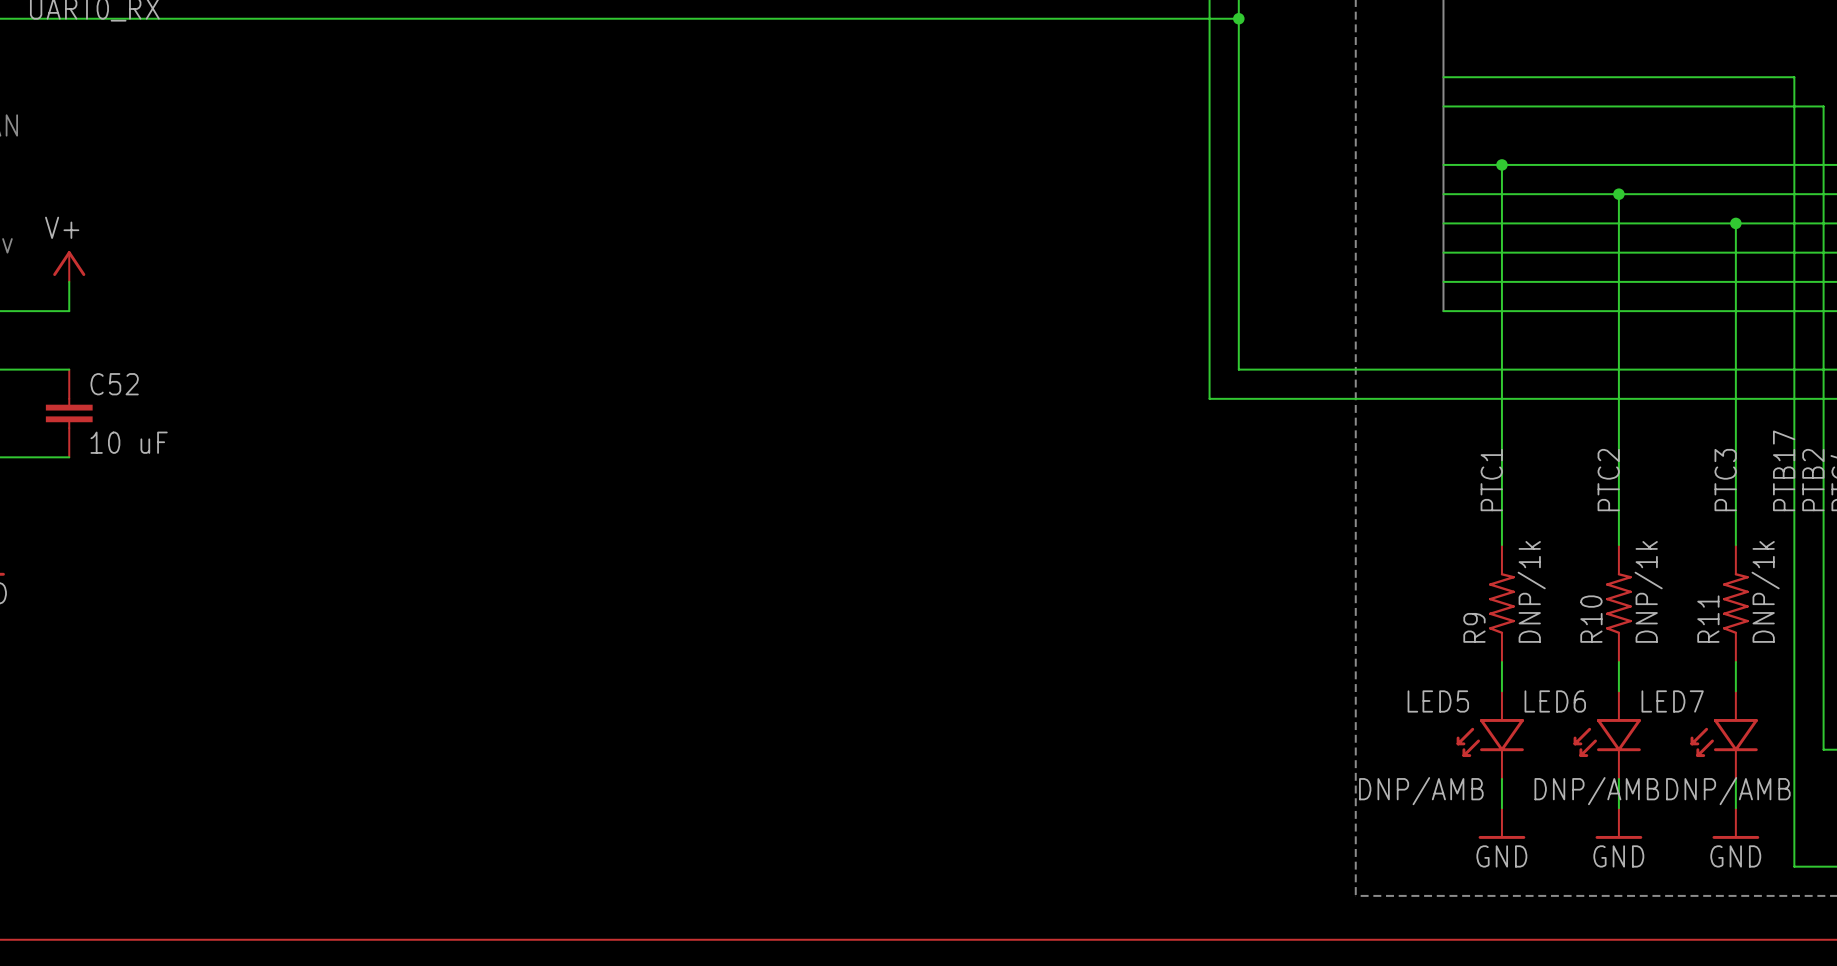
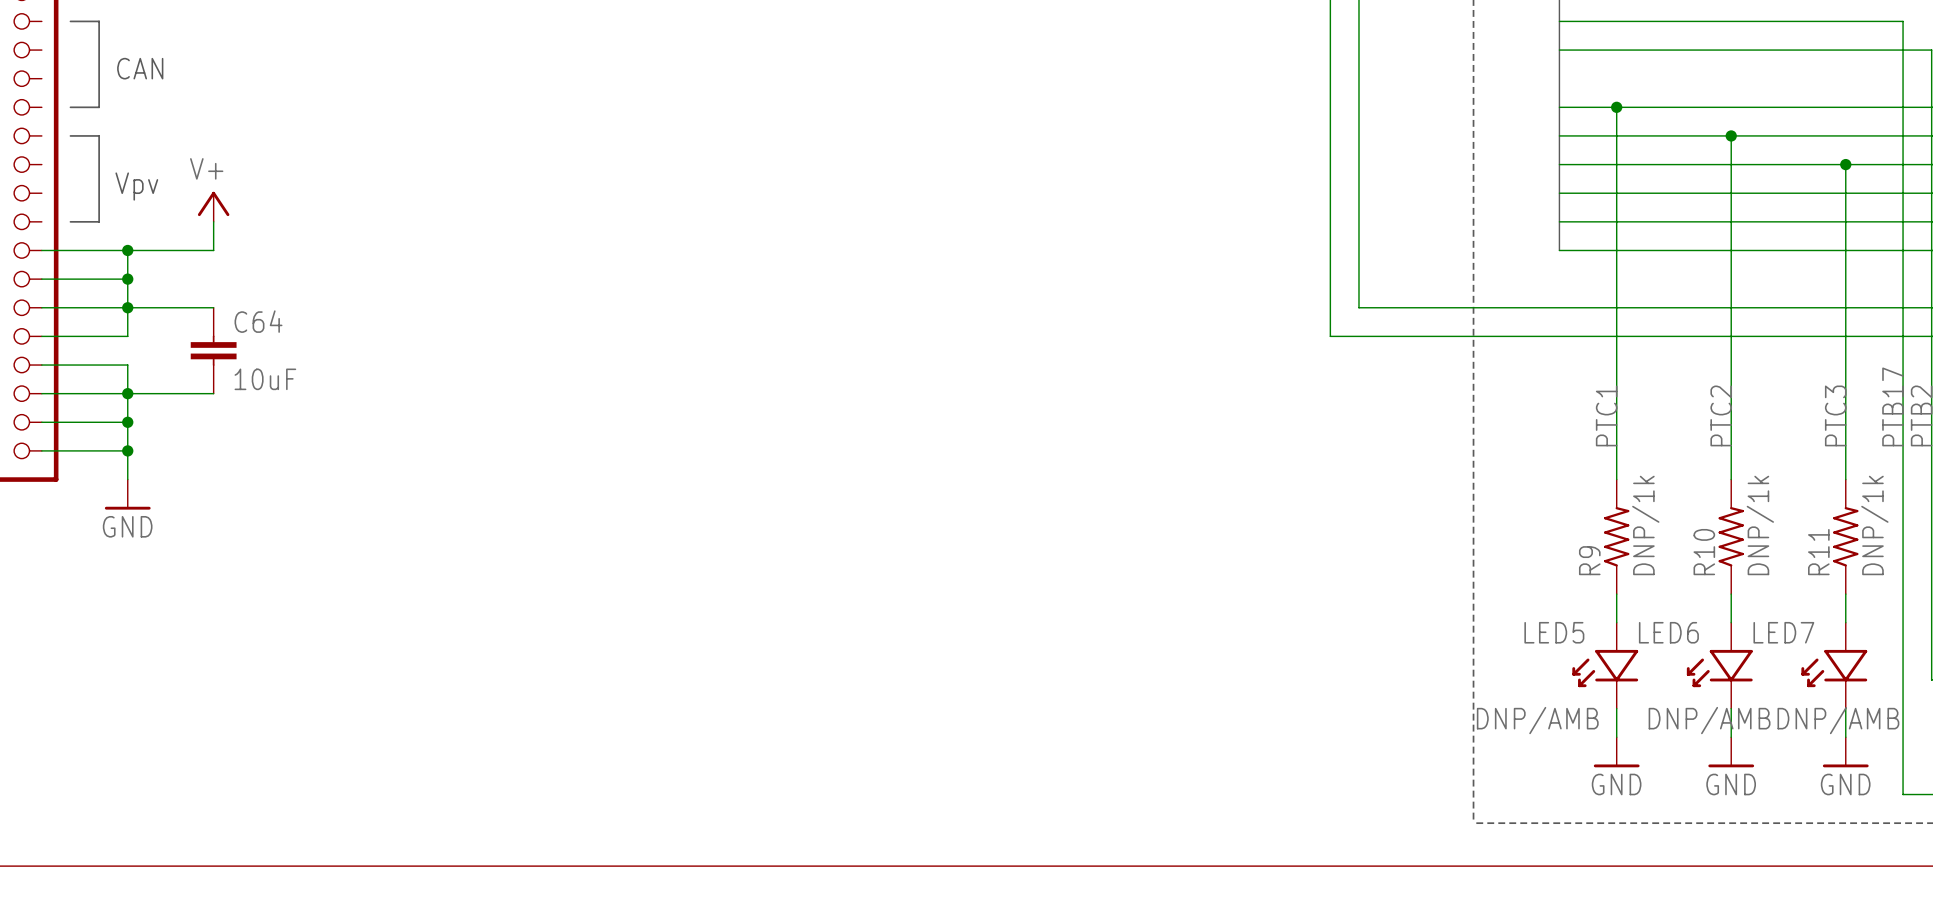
C52 name: C52 (114, 384) -> C64 (258, 321)
C52 value: 10 uF (129, 442) -> 10uF (265, 379)

